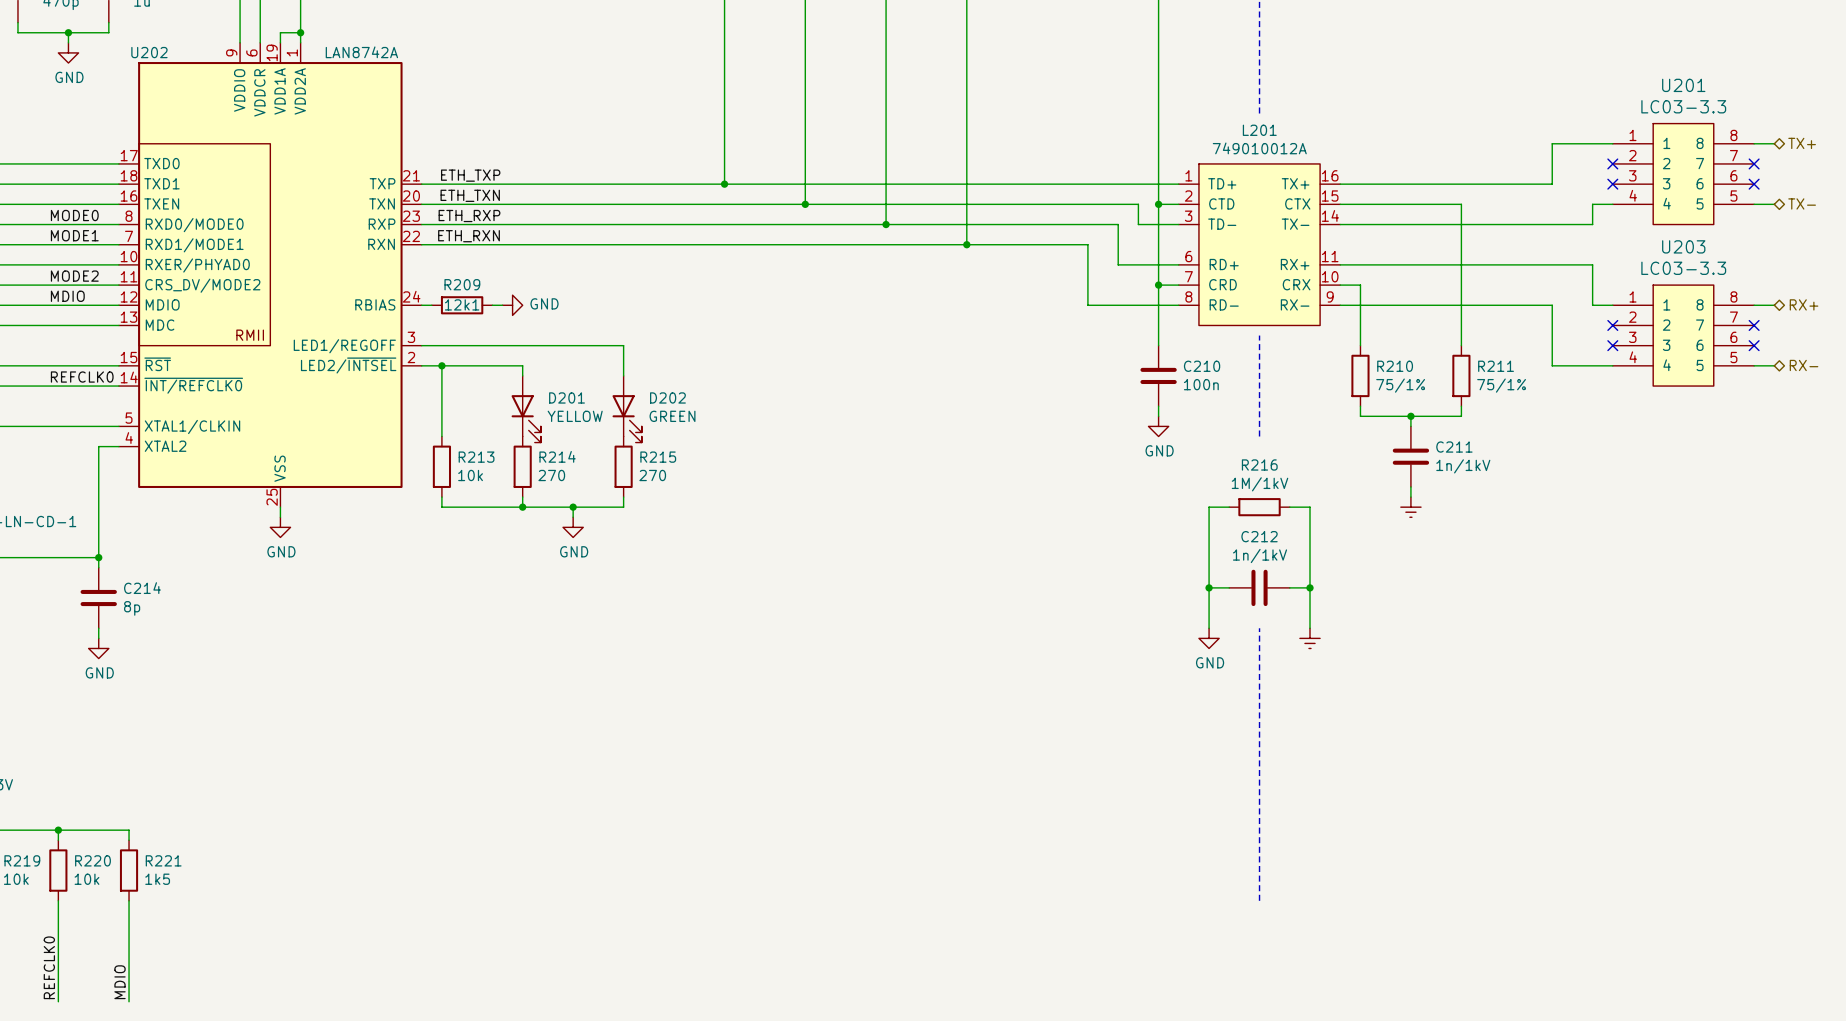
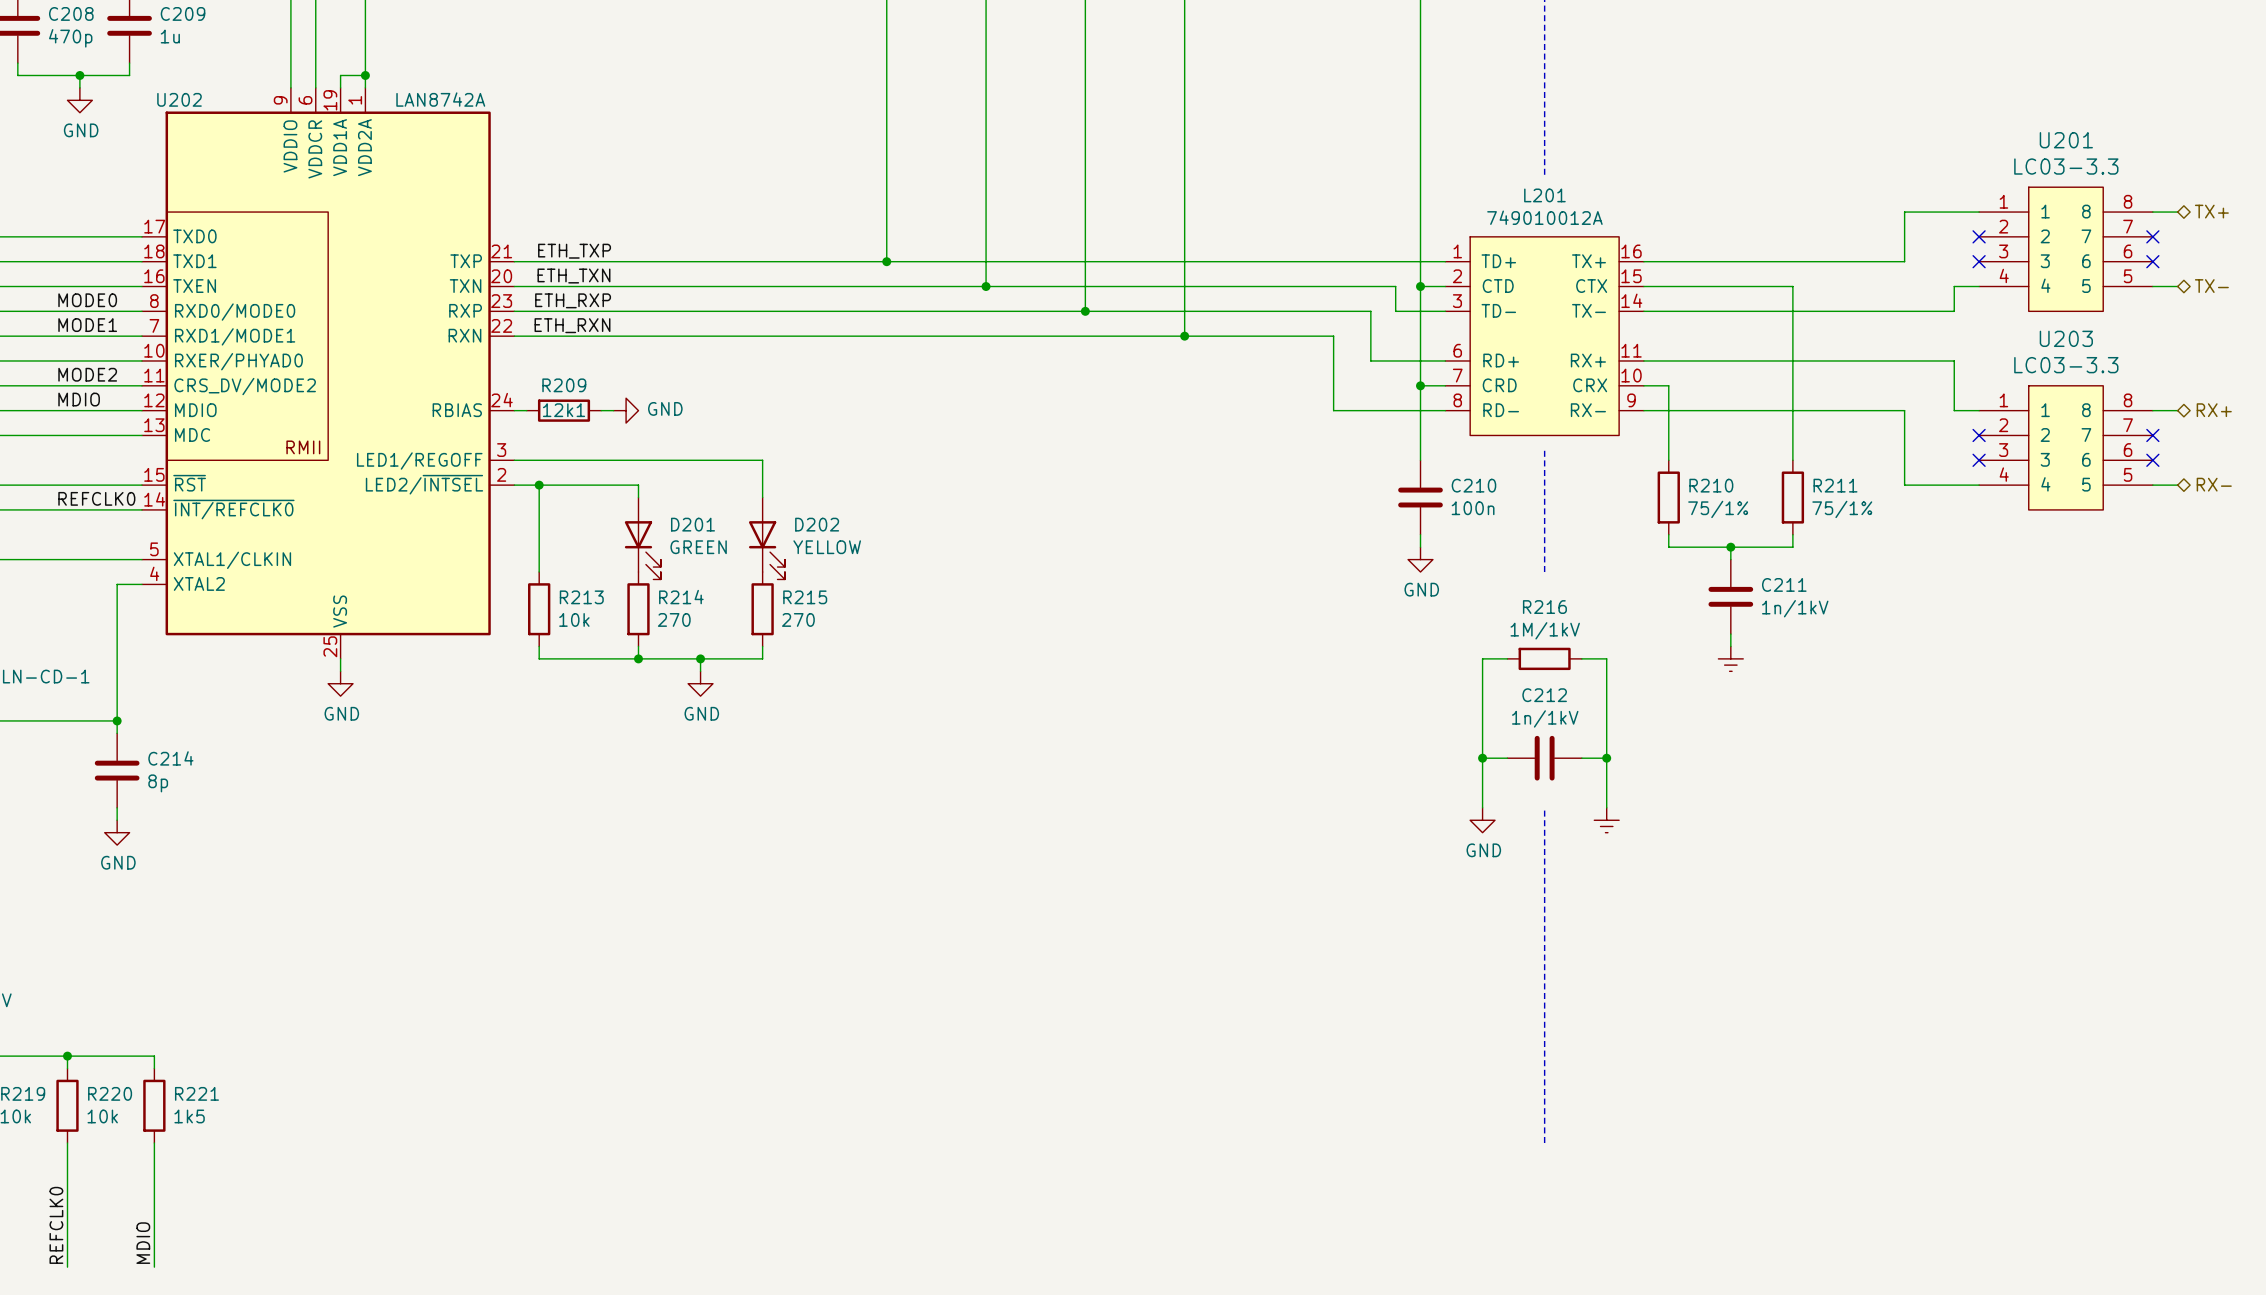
D201 value: YELLOW (575, 416) -> GREEN (698, 547)
D202 value: GREEN (672, 416) -> YELLOW (827, 547)

